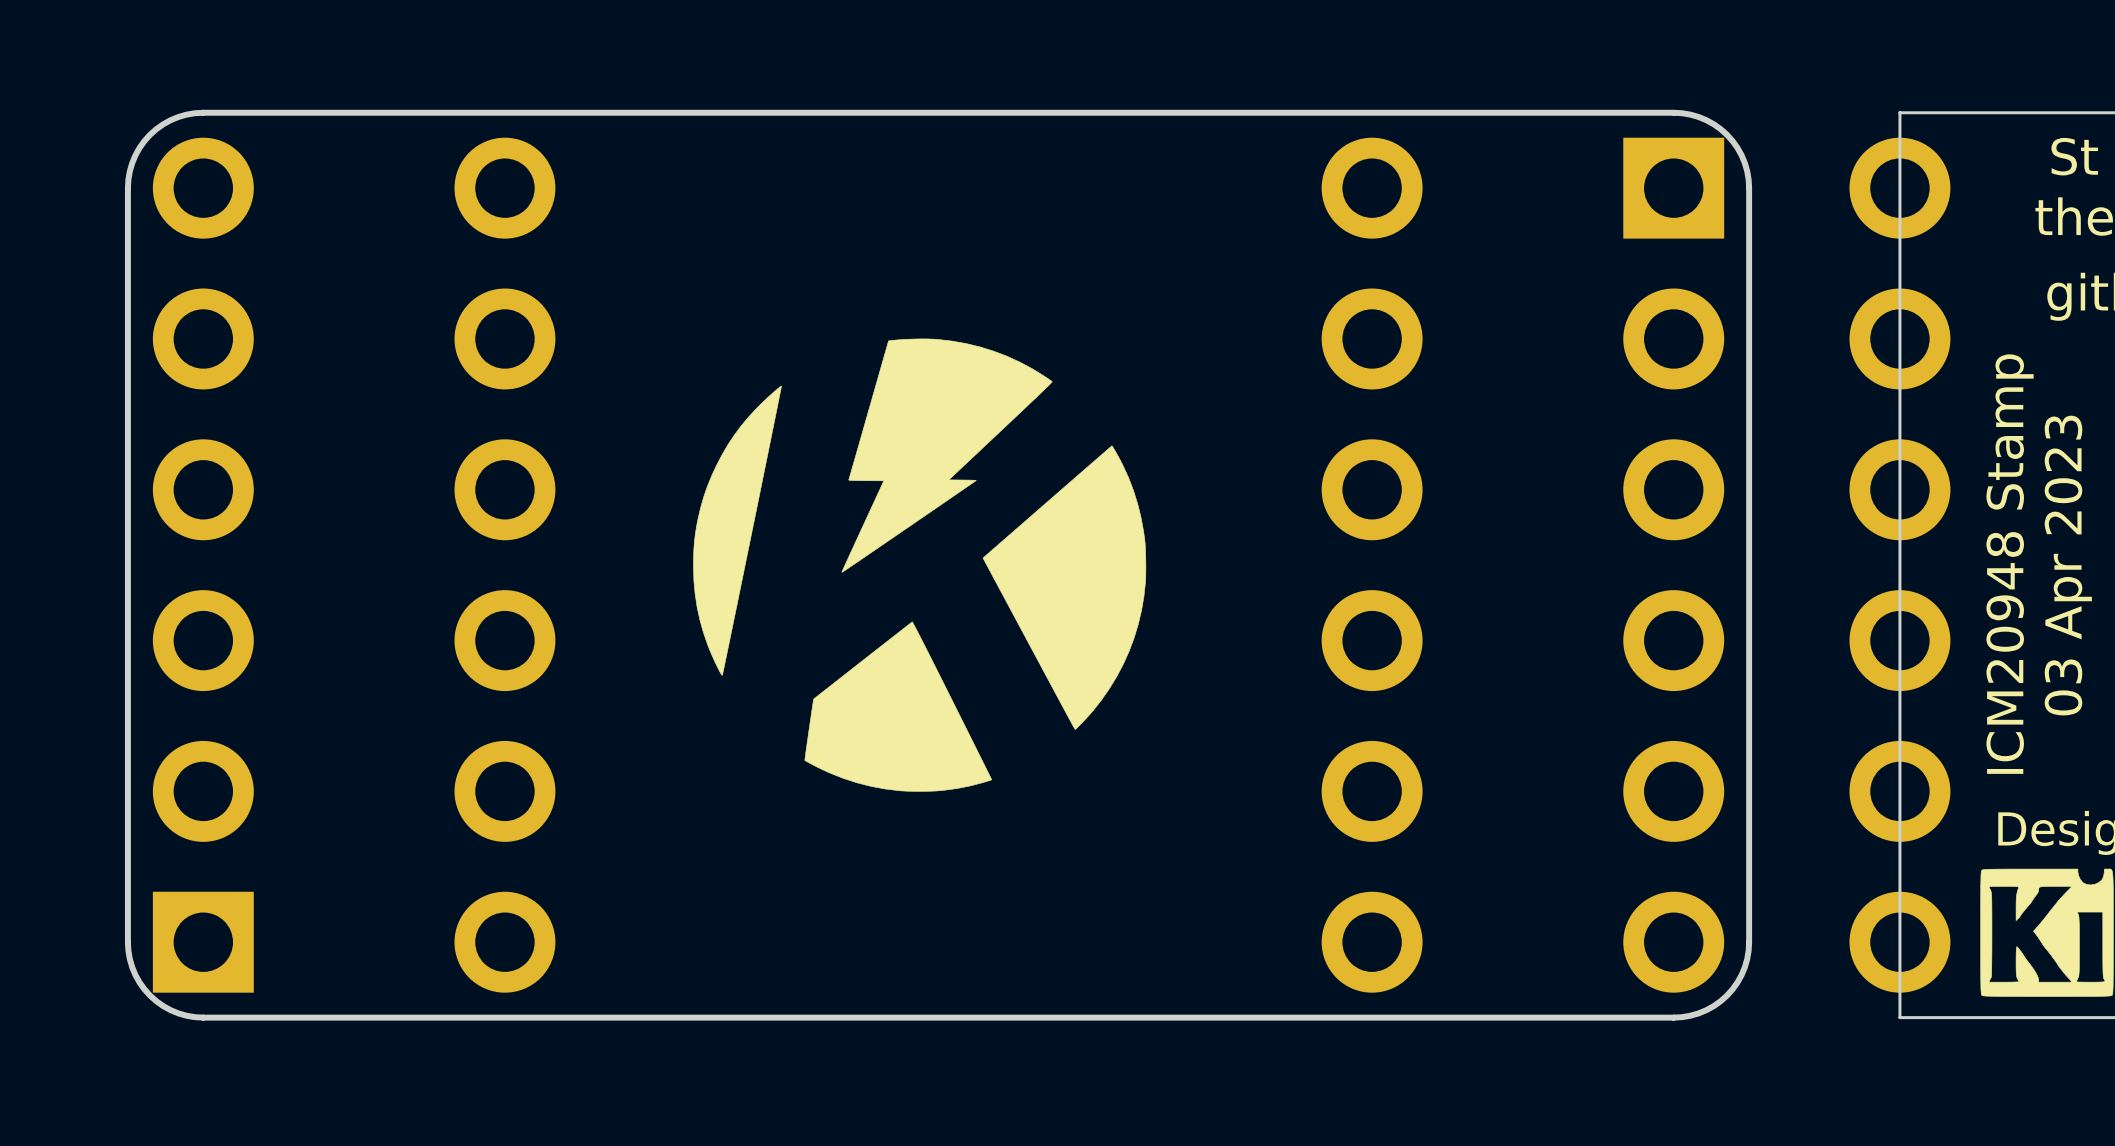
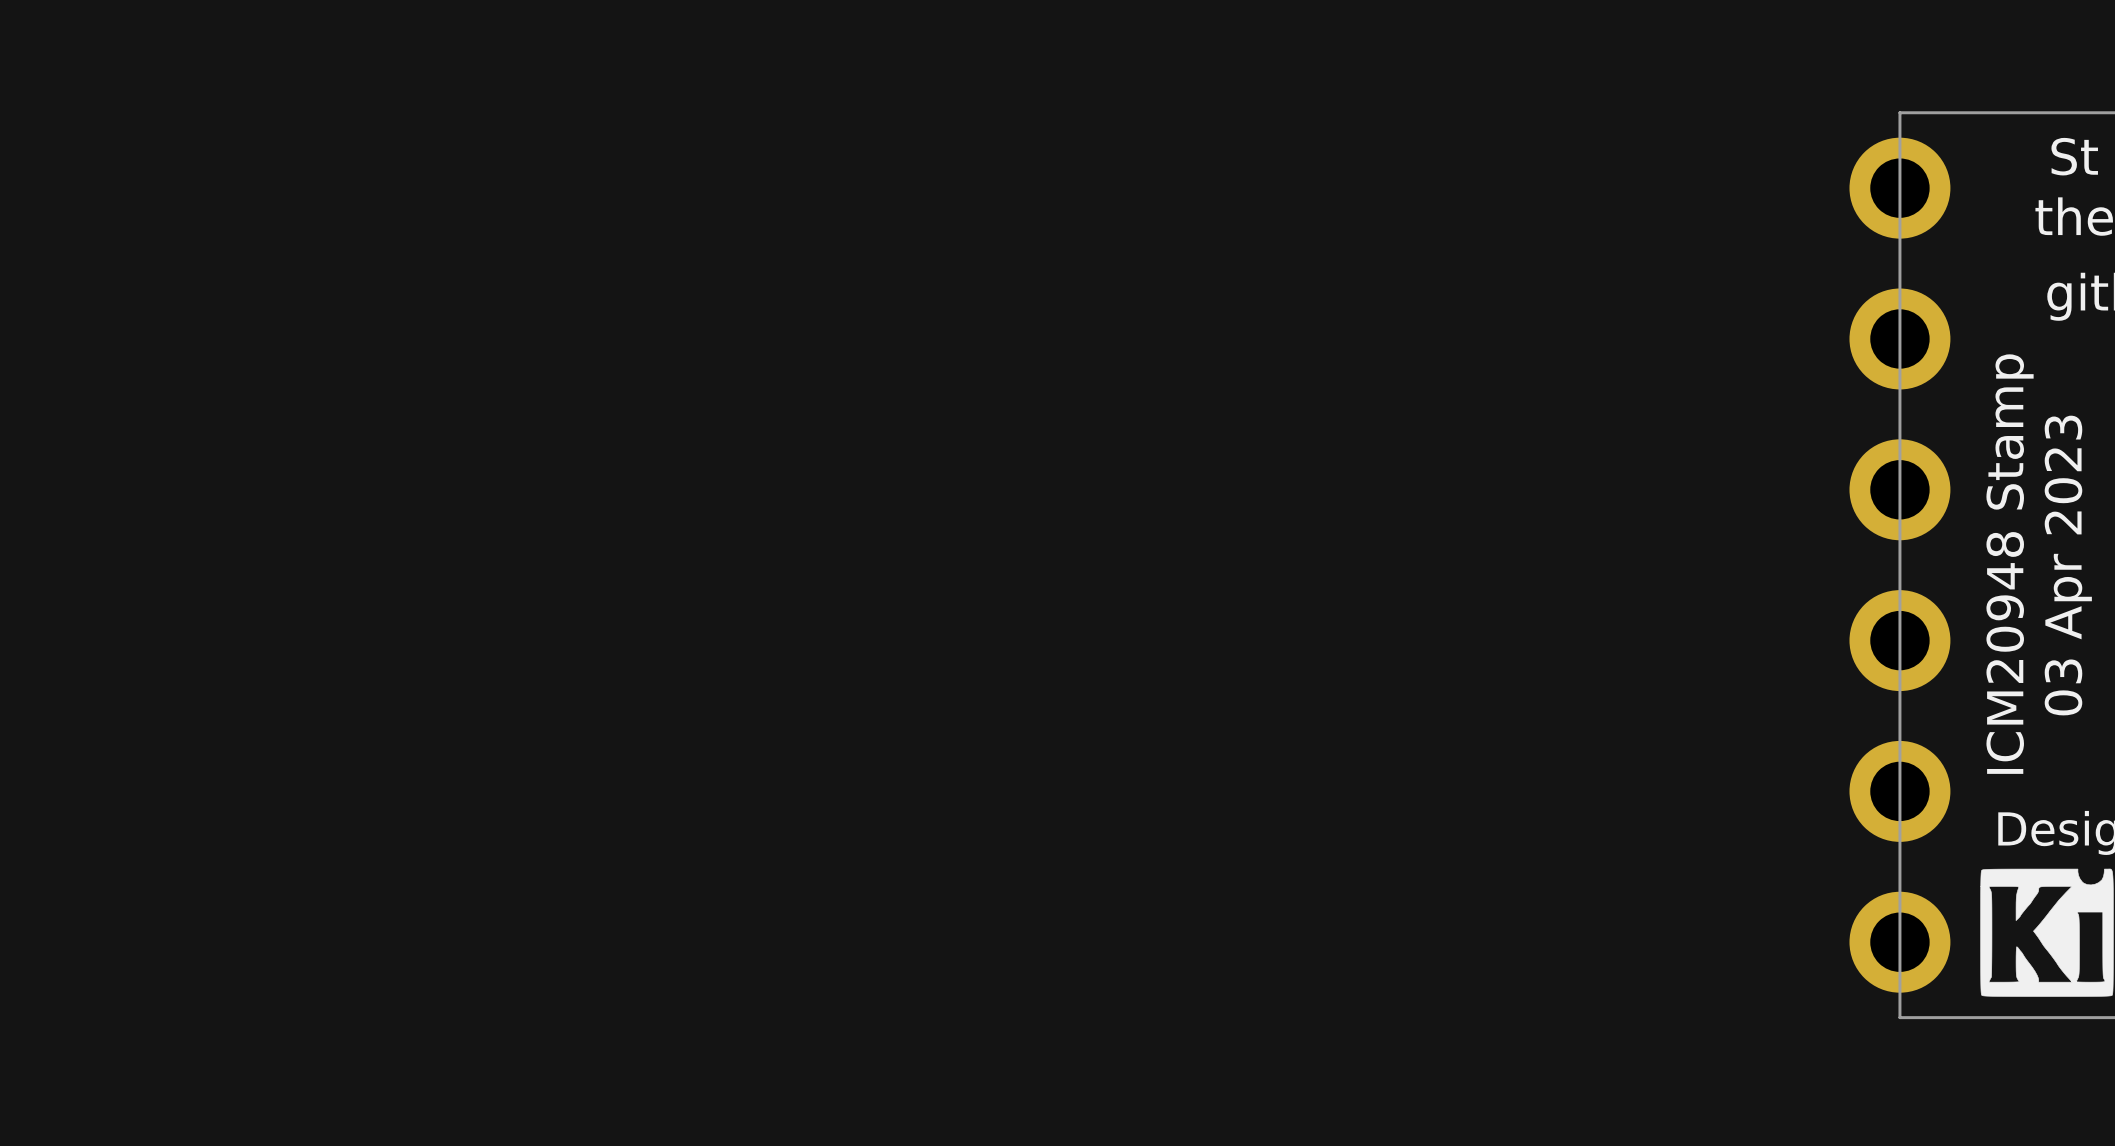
board edge: (1673, 112) (203, 112) (178, 116) (163, 124) (150, 134) (139, 148) (132, 163) (127, 188) (127, 942) (132, 967) (139, 982) (156, 1001) (170, 1010) (186, 1015) (203, 1017) (1673, 1017) (1690, 1015) (1713, 1006) (1732, 989) (1741, 974) (1747, 958) (1749, 942) (1749, 188) (1747, 171) (1741, 155) (1727, 134) (1713, 124) (1698, 116) (1673, 112) -> none
drawing: [693, 338, 1147, 792] -> none
part: (203, 565) -> none
part: (504, 565) -> none
part: (1372, 565) -> none
part: (1673, 565) -> none

